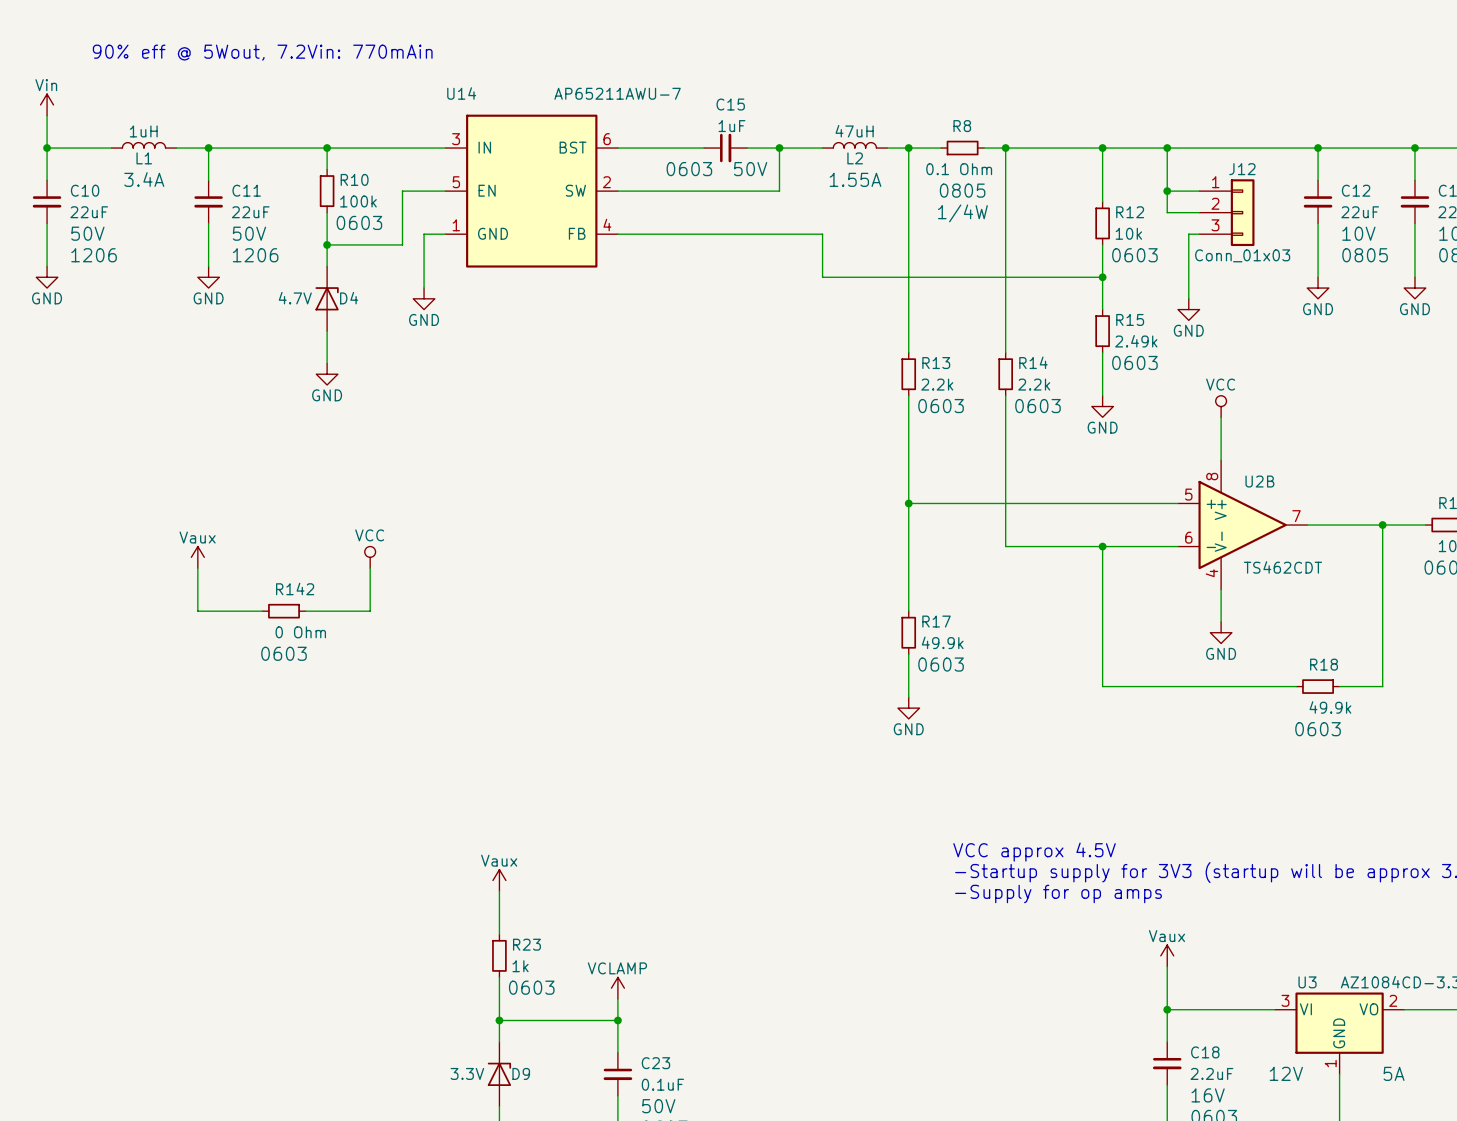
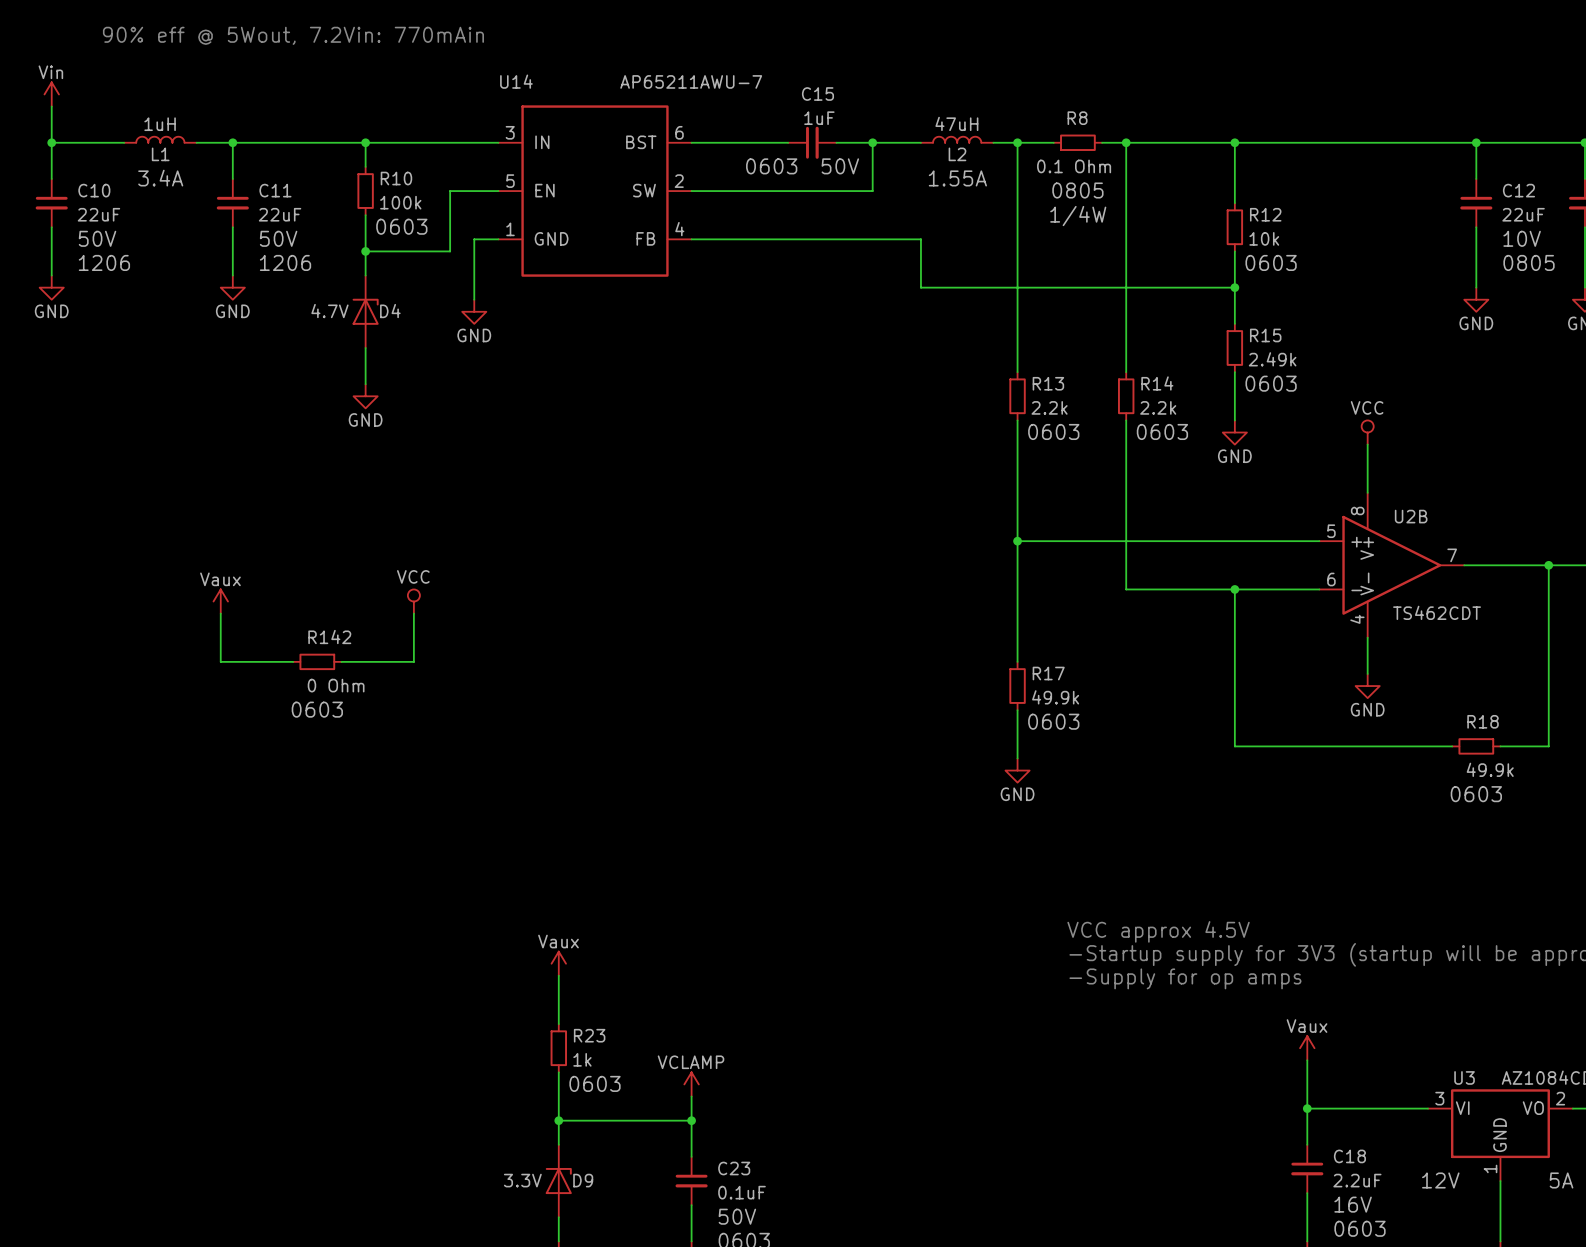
wire: (1167, 148) (1167, 212) (1199, 212) -> none
junction: (1167, 148) -> none
wire: (1167, 191) (1199, 191) -> none
junction: (1167, 191) -> none
J12: Conn_01x03 (1227, 212) -> none
wire: (1199, 234) (1188, 234) (1188, 298) -> none
power symbol: GND (1188, 309) -> none

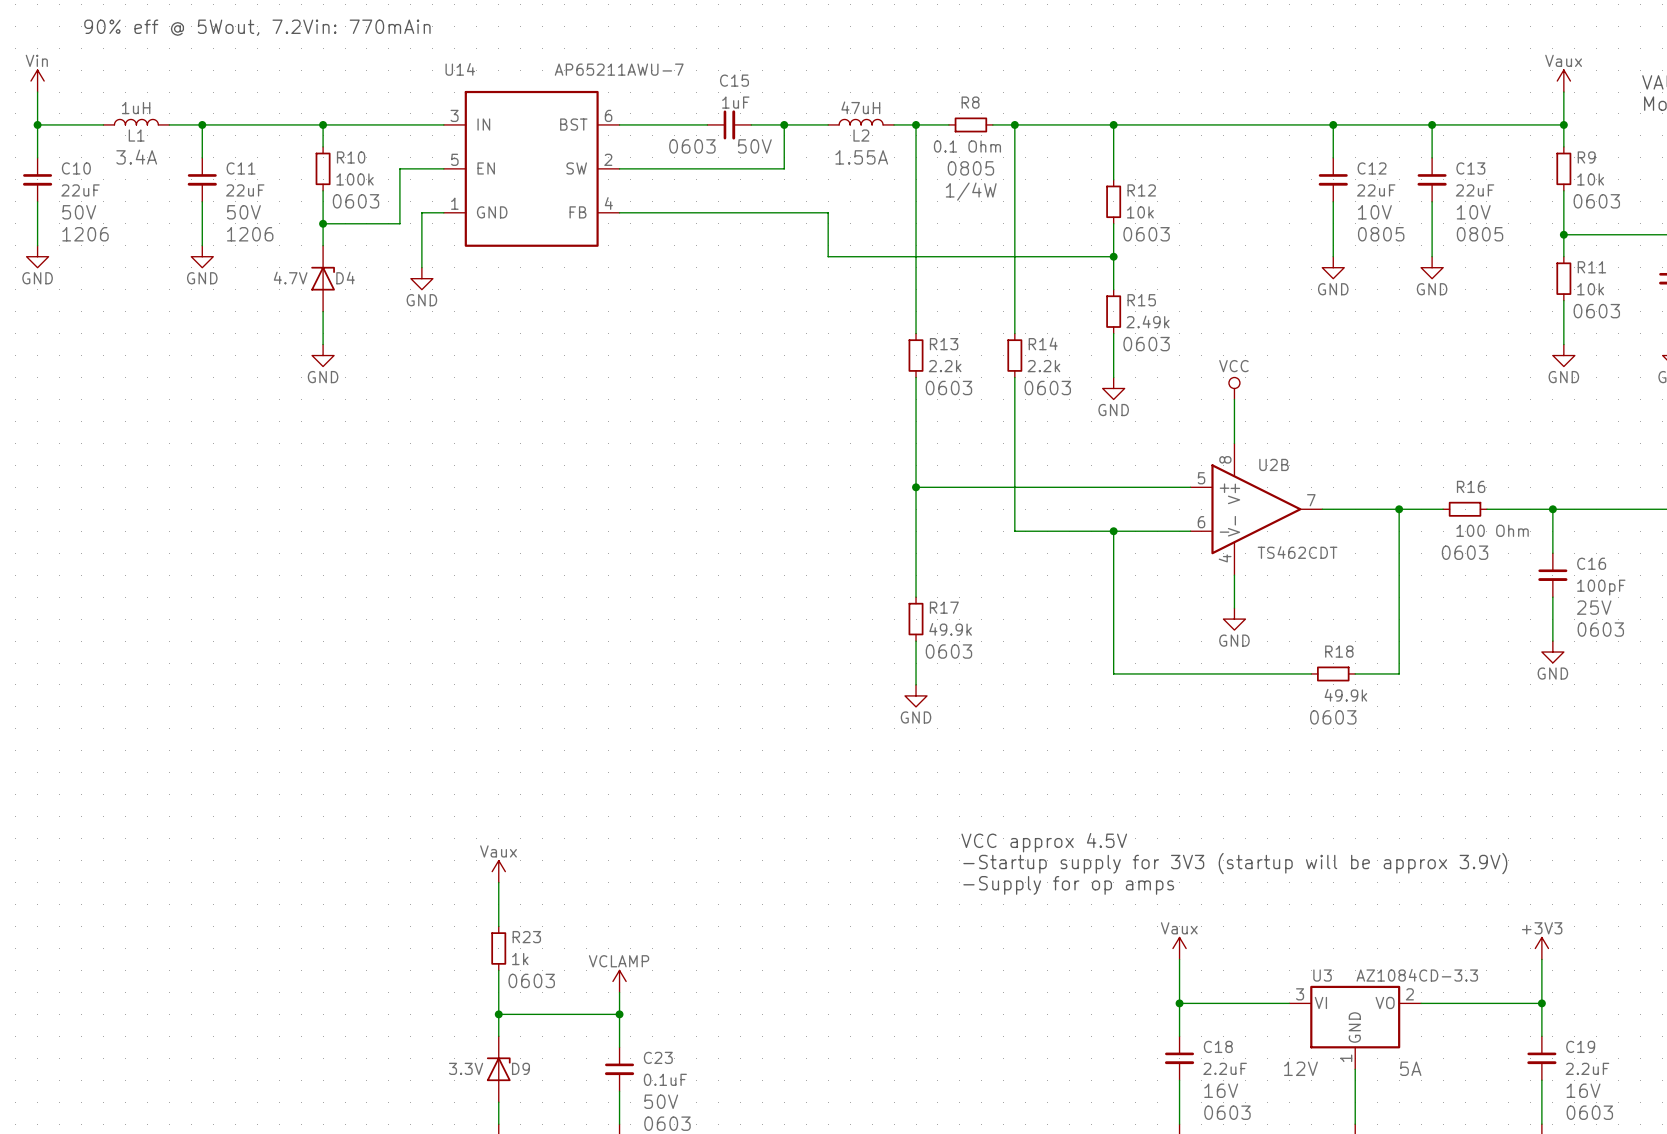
power symbol: Vaux (220, 601) -> none
power symbol: VCC (413, 601) -> none
wire: (220, 613) (220, 661) (293, 661) -> none
wire: (413, 613) (413, 661) (341, 661) -> none
R142: 0 Ohm (317, 661) -> none

